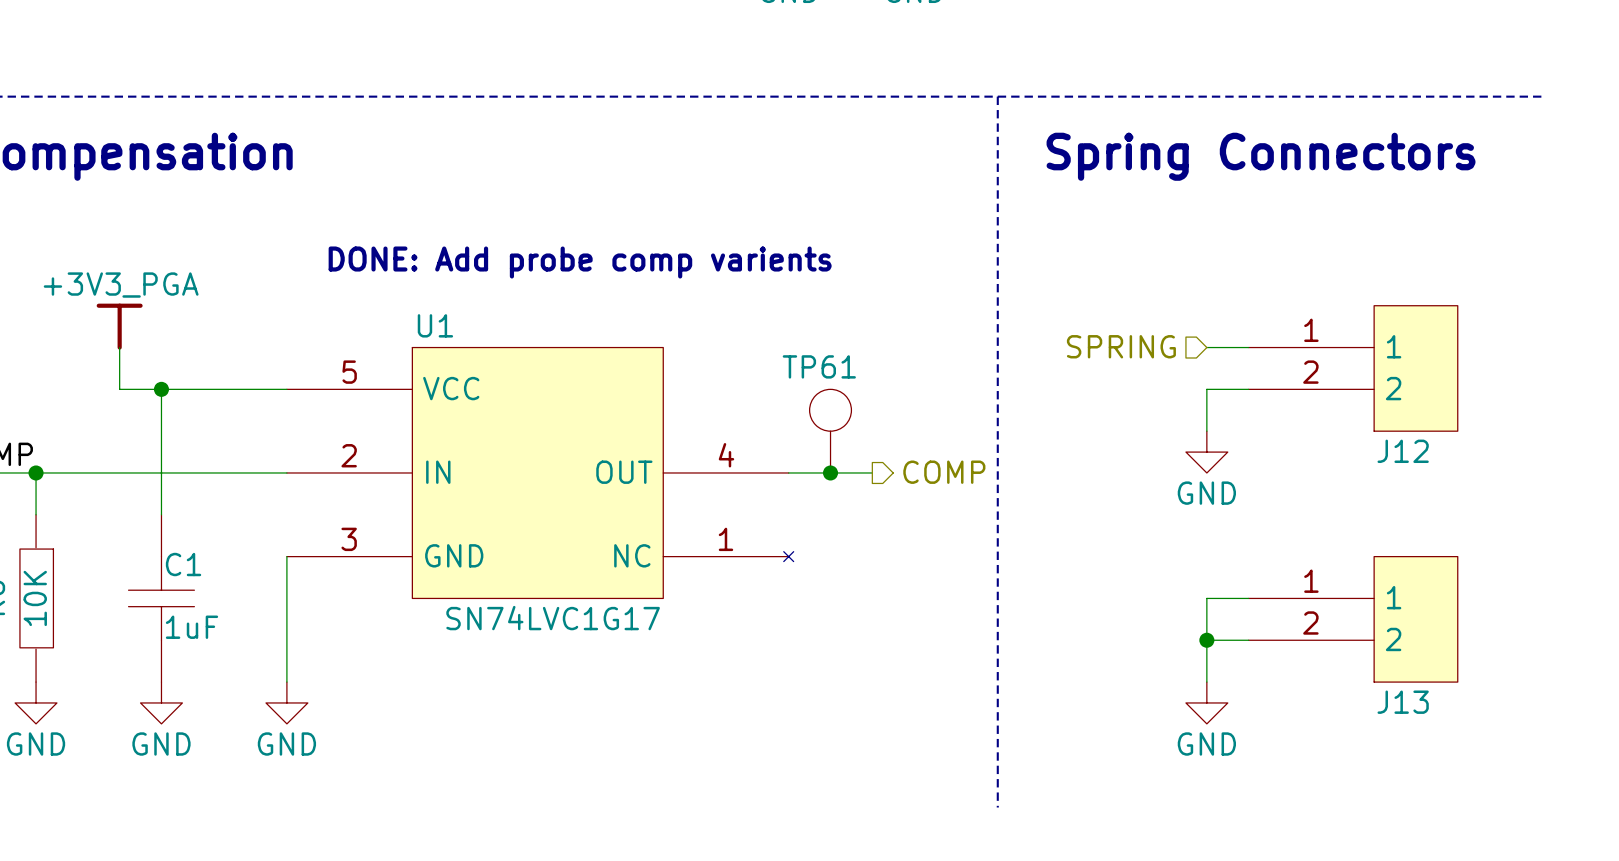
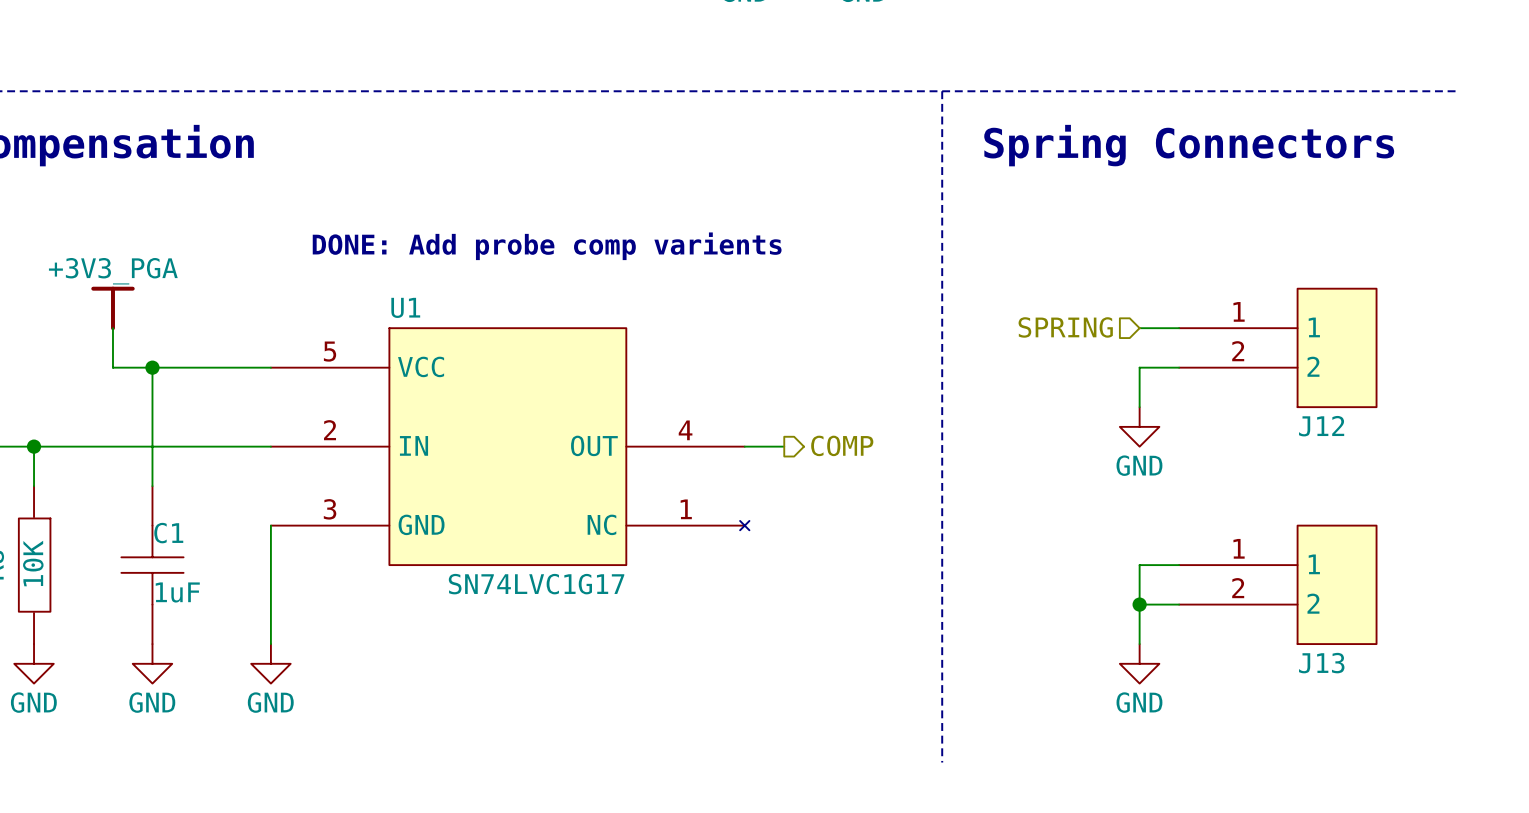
TP61: (830, 431) -> none
wire: (830, 472) (872, 472) -> none
junction: (830, 472) -> none
hierarchical label position: COMP (944, 472) -> COMP (842, 445)

